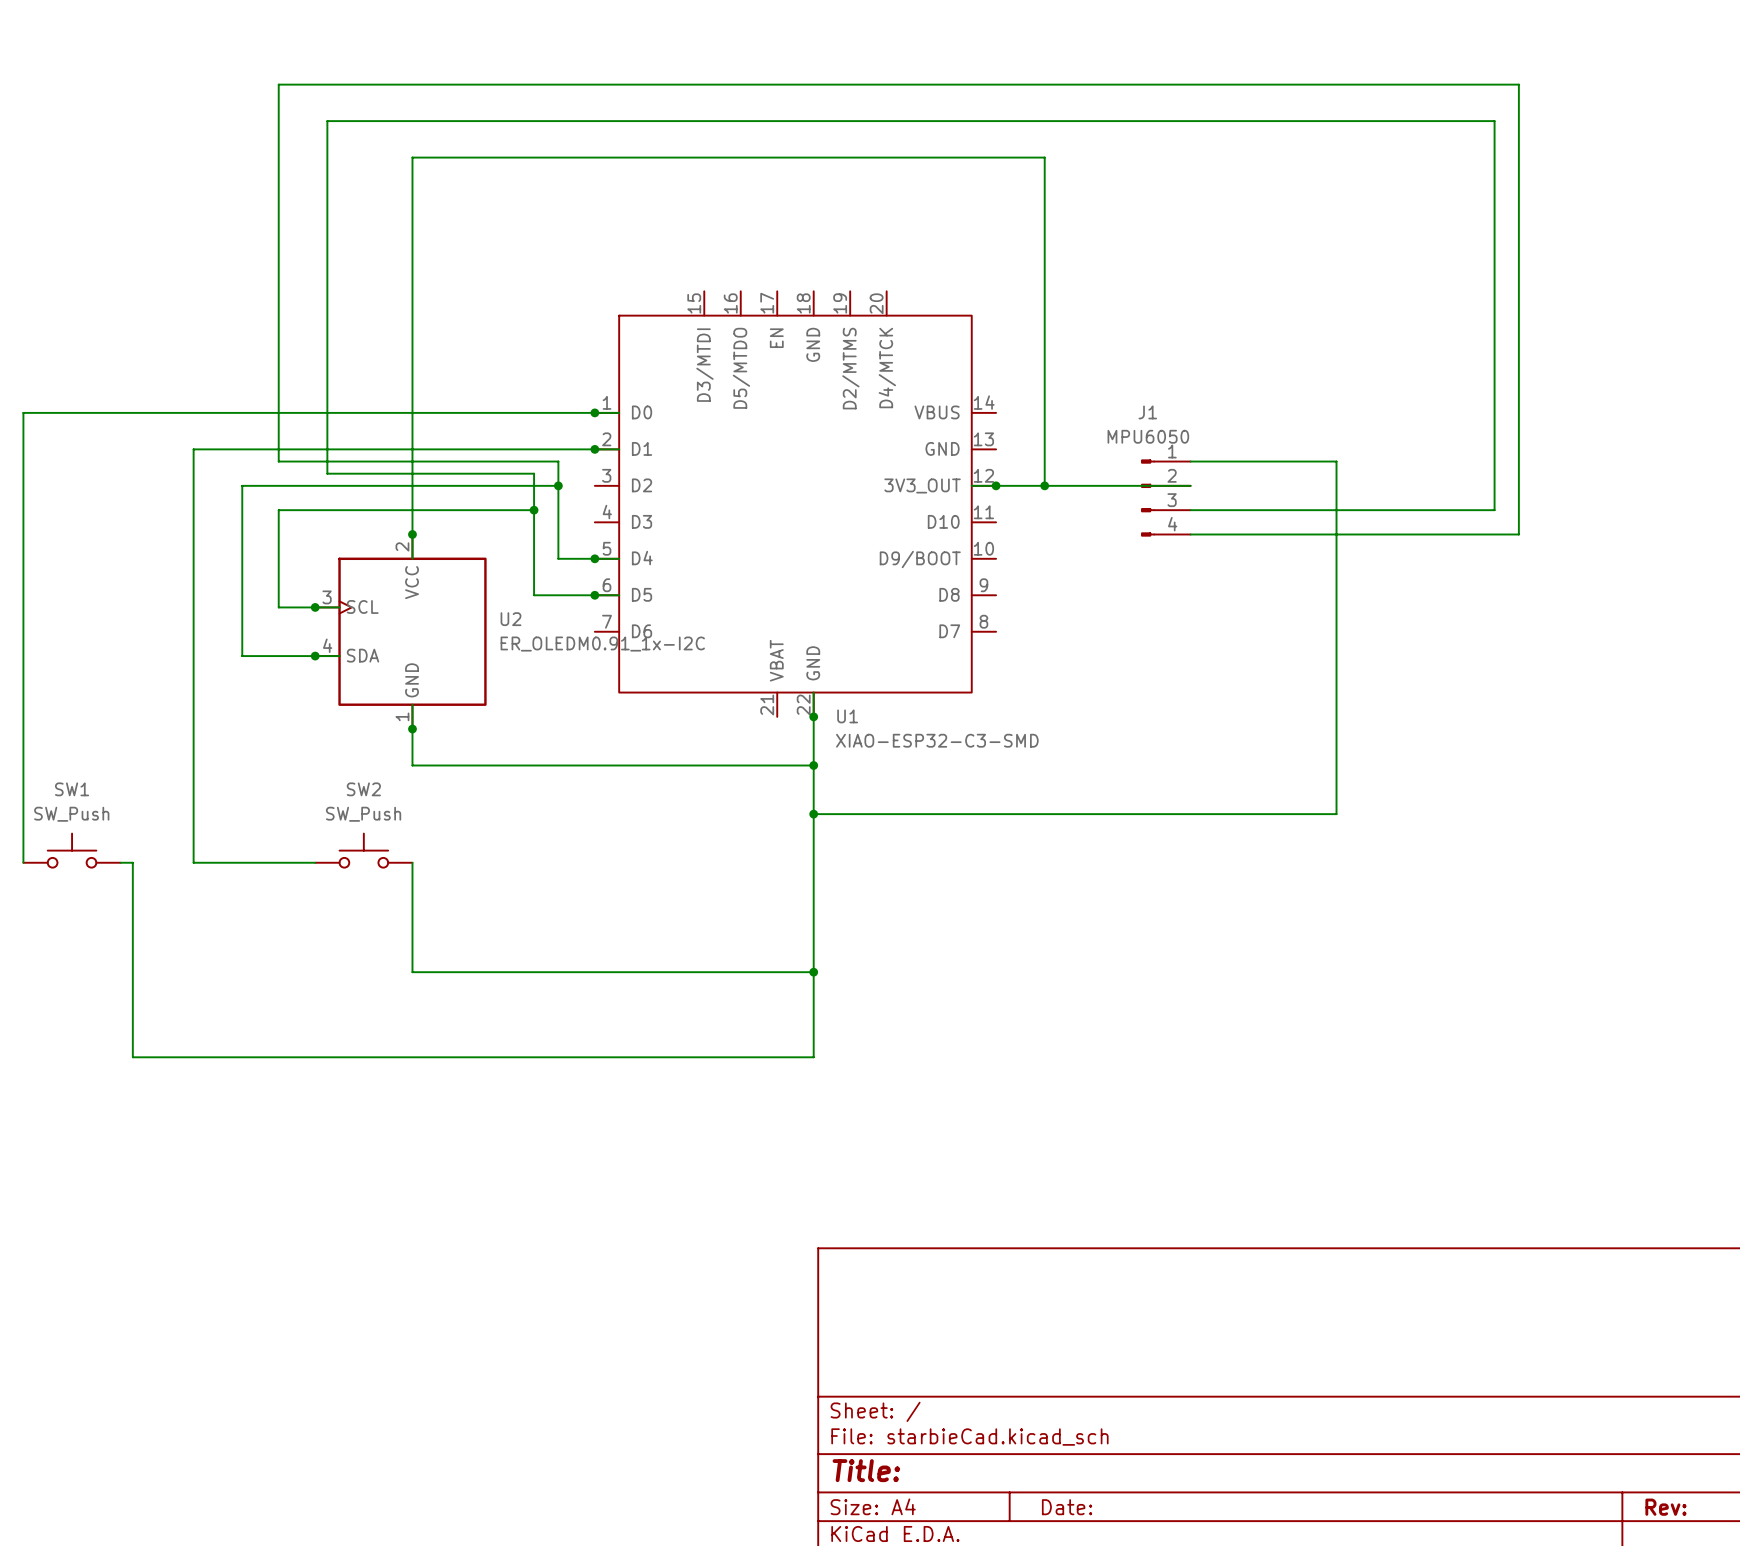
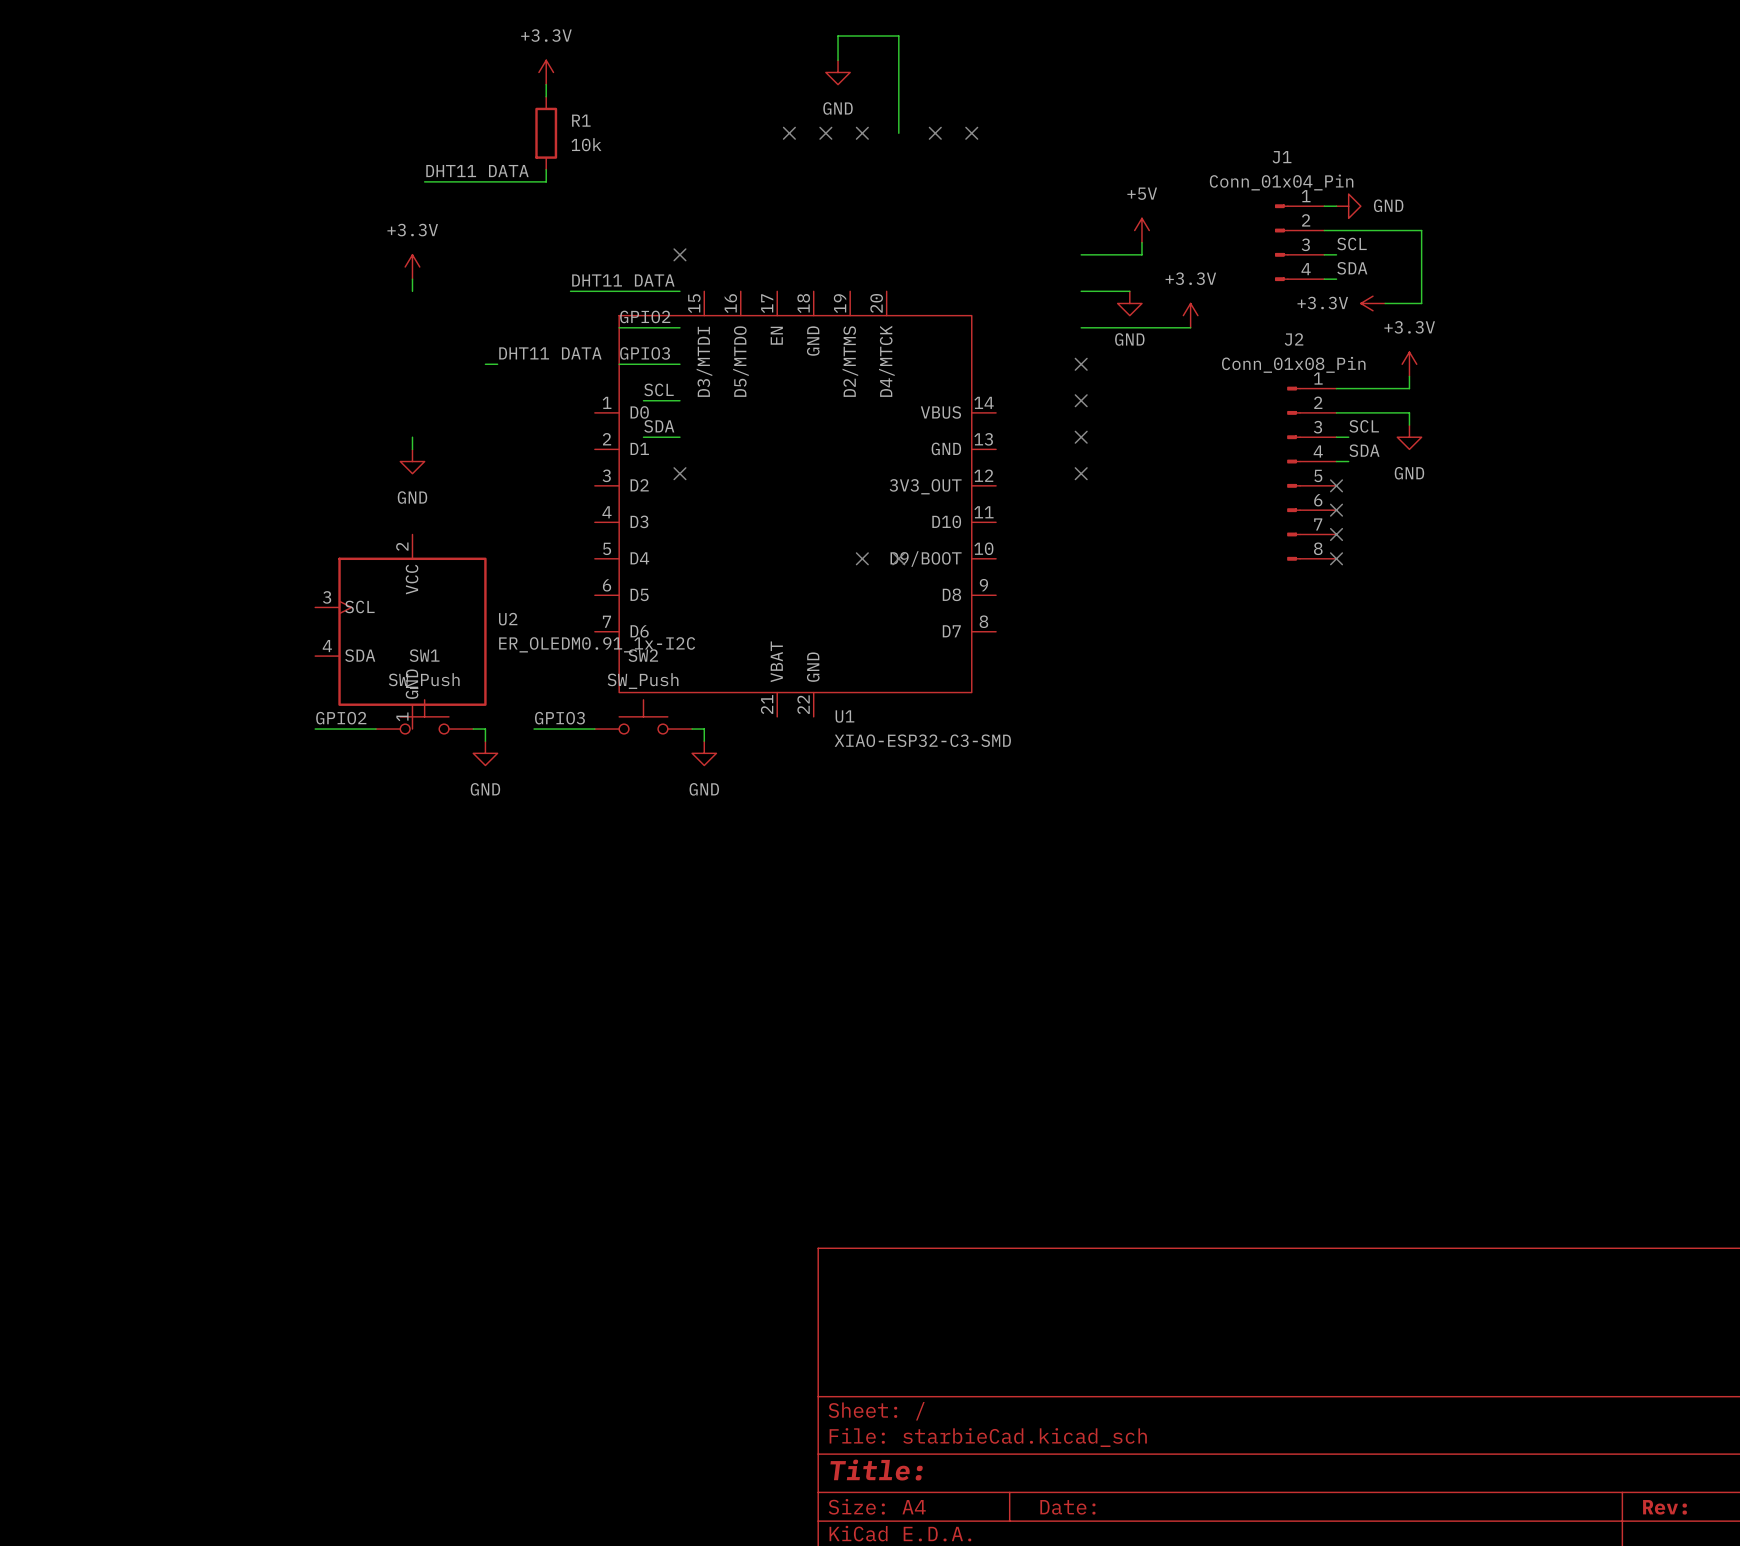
wire: none -> (838, 60) (838, 35) (898, 35) (898, 133)
power symbol: none -> +3.3V (546, 72)
power symbol: none -> GND (838, 72)
wire: none -> (546, 84) (546, 96)
R1: none -> 10k (546, 133)
no-connect mark: none -> (789, 133)
no-connect mark: none -> (825, 133)
no-connect mark: none -> (862, 133)
no-connect mark: none -> (935, 133)
no-connect mark: none -> (971, 133)
wire: none -> (546, 169) (546, 181) (424, 181)
label: none -> DHT11 DATA (477, 171)
wire: none -> (1324, 206) (1336, 206)
power symbol: none -> GND (1348, 206)
power symbol: none -> +5V (1141, 230)
wire: none -> (1324, 230) (1421, 230) (1421, 303) (1385, 303)
wire: none -> (1141, 242) (1141, 254) (1081, 254)
label: none -> SCL (1352, 243)
no-connect mark: none -> (679, 254)
wire: none -> (1324, 254) (1336, 254)
power symbol: none -> +3.3V (412, 267)
label: none -> SDA (1352, 268)
wire: (412, 279) (412, 157) (1044, 157) (1044, 485) -> none
wire: none -> (1324, 279) (1336, 279)
label: none -> DHT11 DATA (623, 280)
wire: (412, 291) (412, 437) -> none
wire: none -> (570, 291) (679, 291)
wire: none -> (1081, 291) (1129, 291)
power symbol: none -> GND (1129, 303)
power symbol: none -> +3.3V (1372, 303)
power symbol: none -> +3.3V (1190, 315)
label: none -> GPIO2 (645, 316)
wire: none -> (619, 327) (679, 327)
wire: none -> (1081, 327) (1190, 327)
label: none -> DHT11 DATA (550, 353)
label: none -> GPIO3 (645, 353)
wire: none -> (485, 364) (497, 364)
wire: none -> (619, 364) (679, 364)
no-connect mark: none -> (1081, 364)
power symbol: none -> +3.3V (1409, 364)
wire: none -> (1409, 376) (1409, 388) (1336, 388)
label: none -> SCL (658, 389)
wire: none -> (643, 400) (679, 400)
no-connect mark: none -> (1081, 400)
junction: (594, 412) -> none
wire: (619, 412) (23, 412) (23, 862) -> none
wire: none -> (1336, 412) (1409, 412) (1409, 425)
label: none -> SDA (659, 426)
label: none -> SCL (1364, 426)
J1 value: MPU6050 (1148, 436) -> Conn_01x04_Pin (1281, 182)
wire: none -> (643, 437) (679, 437)
no-connect mark: none -> (1081, 437)
wire: none -> (1336, 437) (1348, 437)
power symbol: none -> GND (1409, 437)
wire: (412, 449) (412, 558) -> none
junction: (594, 449) -> none
wire: (619, 449) (193, 449) (193, 862) (315, 862) -> none
label: none -> SDA (1364, 450)
power symbol: none -> GND (412, 461)
wire: (1190, 461) (1336, 461) (1336, 814) (813, 814) -> none
wire: none -> (1336, 461) (1348, 461)
no-connect mark: none -> (679, 473)
no-connect mark: none -> (1081, 473)
J2: none -> Conn_01x08_Pin (1311, 473)
wire: (558, 485) (242, 485) (242, 656) (339, 656) -> none
junction: (558, 485) -> none
wire: (971, 485) (1190, 485) -> none
junction: (996, 485) -> none
junction: (1044, 485) -> none
no-connect mark: none -> (1336, 485)
J1 position: (1165, 498) -> (1299, 242)
wire: (534, 510) (278, 510) (278, 607) (339, 607) -> none
junction: (534, 510) -> none
wire: (1190, 510) (1494, 510) (1494, 121) (327, 121) (327, 473) (534, 473) (534, 595) (619, 595) -> none
no-connect mark: none -> (1336, 510)
junction: (412, 534) -> none
wire: (1190, 534) (1518, 534) (1518, 84) (278, 84) (278, 461) (558, 461) (558, 558) (619, 558) -> none
no-connect mark: none -> (1336, 534)
junction: (594, 558) -> none
no-connect mark: none -> (862, 558)
no-connect mark: none -> (898, 558)
no-connect mark: none -> (1336, 558)
junction: (594, 595) -> none
junction: (315, 607) -> none
junction: (315, 656) -> none
wire: (813, 692) (813, 1057) (132, 1057) (132, 862) (120, 862) -> none
wire: (412, 704) (412, 765) (813, 765) -> none
junction: (813, 716) -> none
label: none -> GPIO2 (341, 718)
label: none -> GPIO3 (559, 718)
wire: none -> (315, 729) (376, 729)
junction: (412, 729) -> none
wire: none -> (473, 729) (485, 729) (485, 741)
wire: none -> (534, 729) (594, 729)
wire: none -> (692, 729) (704, 729) (704, 741)
power symbol: none -> GND (485, 753)
power symbol: none -> GND (704, 753)
junction: (813, 765) -> none
junction: (813, 814) -> none
SW1 position: (72, 850) -> (424, 716)
SW2 position: (363, 850) -> (643, 716)
wire: (412, 862) (412, 972) (813, 972) -> none
junction: (813, 972) -> none

